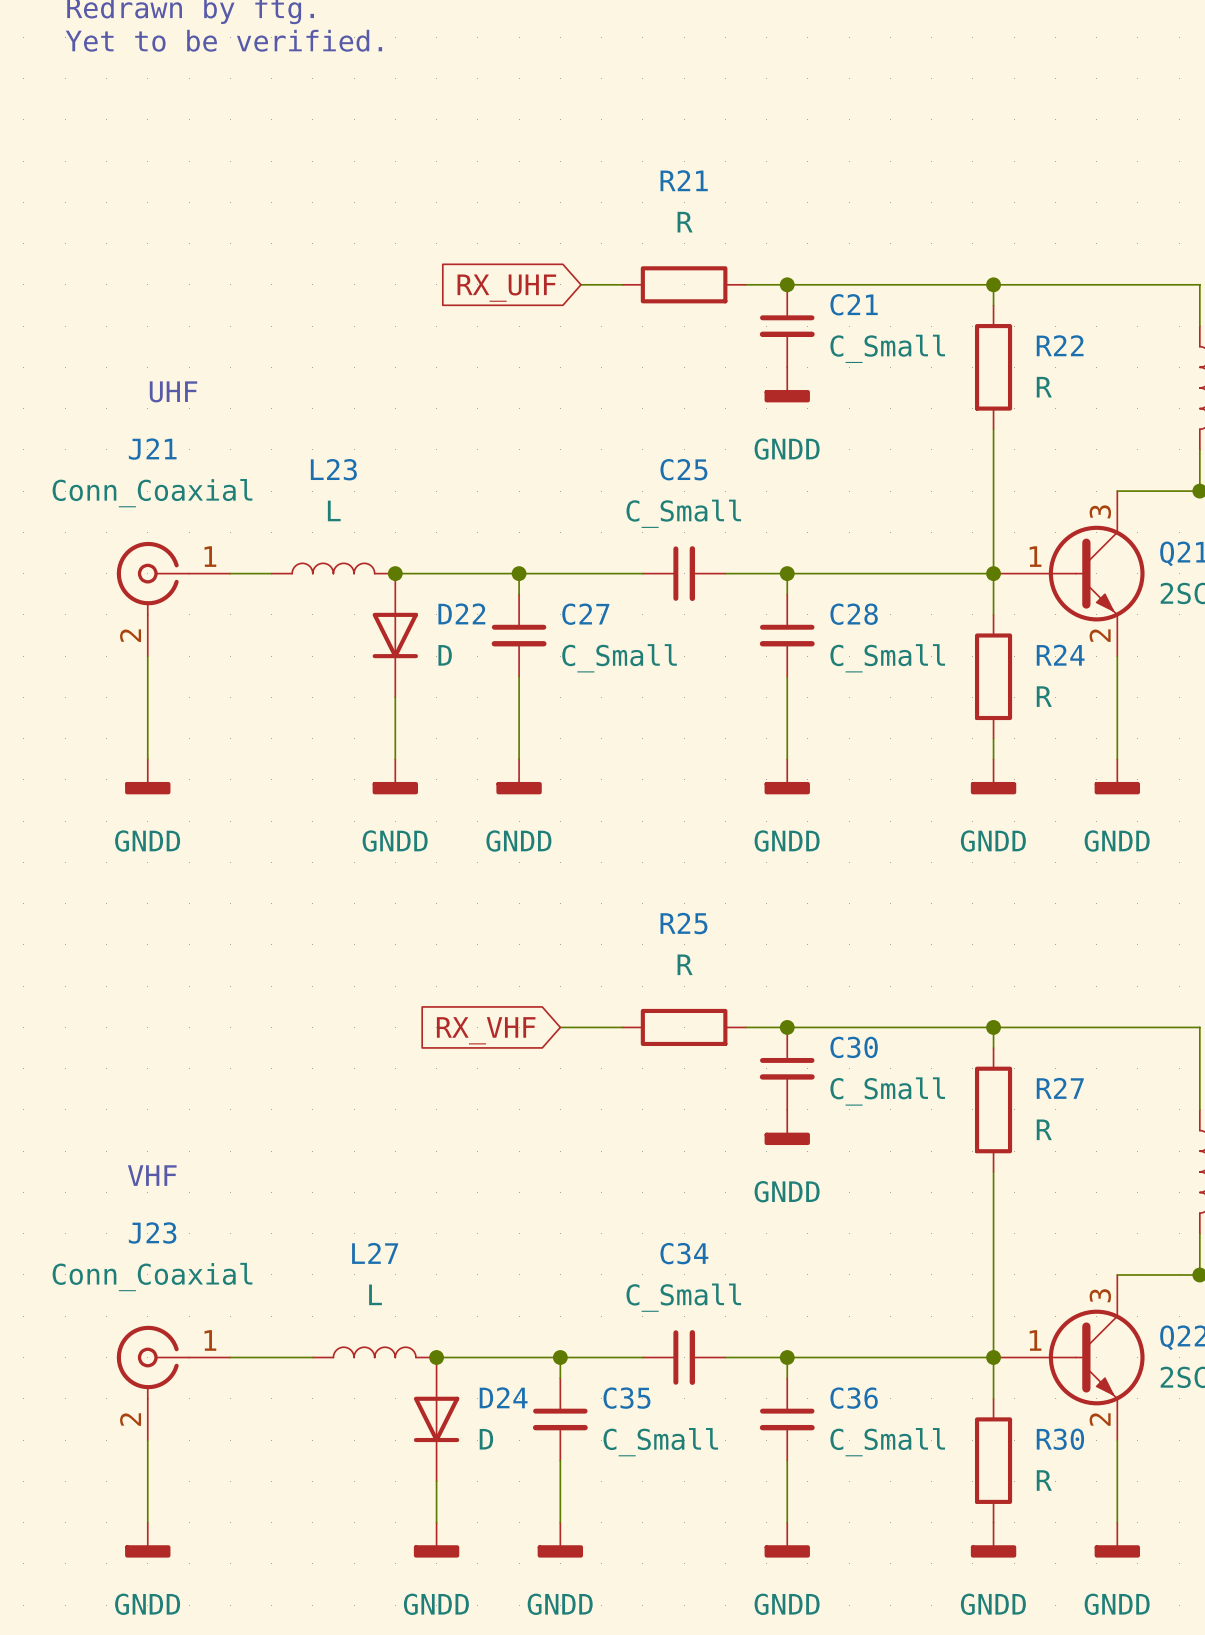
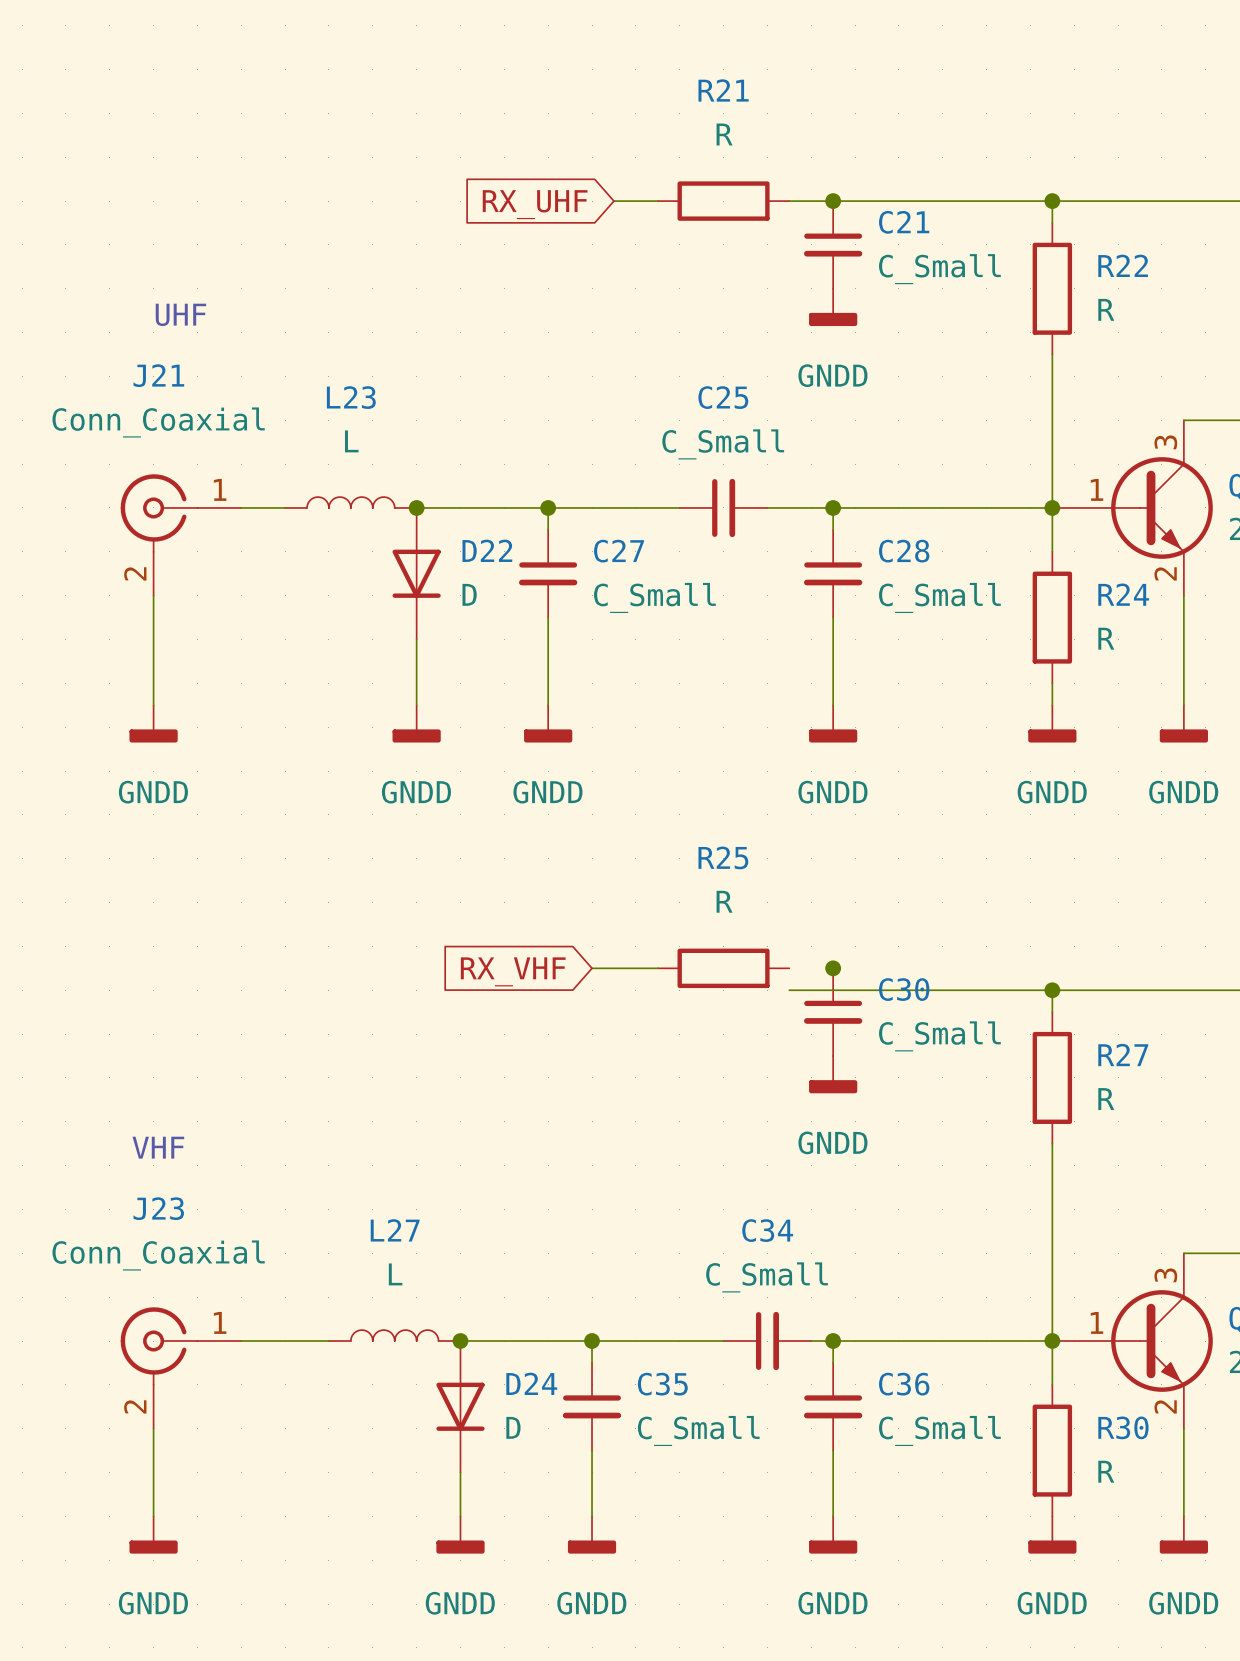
wire: (560, 1027) (622, 1027) -> (592, 968) (657, 968)
R25 position: (684, 1027) -> (723, 968)
junction position: (787, 1027) -> (833, 968)
global label position: RX_VHF (486, 1030) -> RX_VHF (513, 971)
C30 position: (787, 1068) -> (833, 1012)
power symbol position: GNDD (787, 1127) -> GNDD (833, 1074)
C34 position: (684, 1357) -> (767, 1341)

